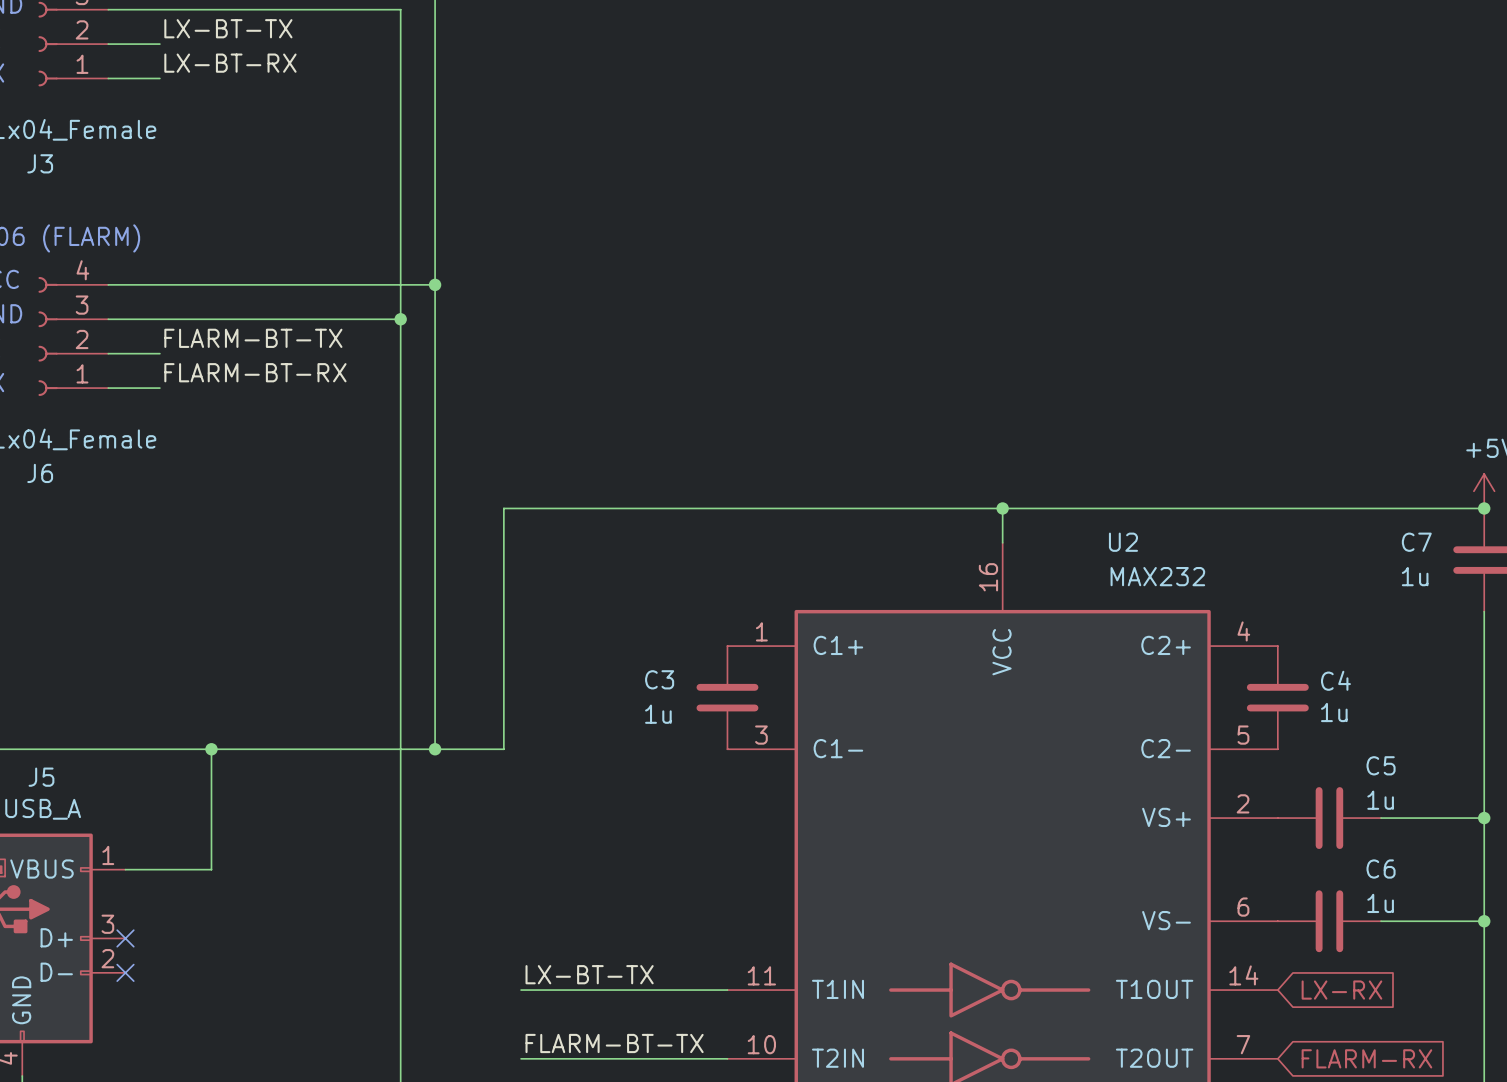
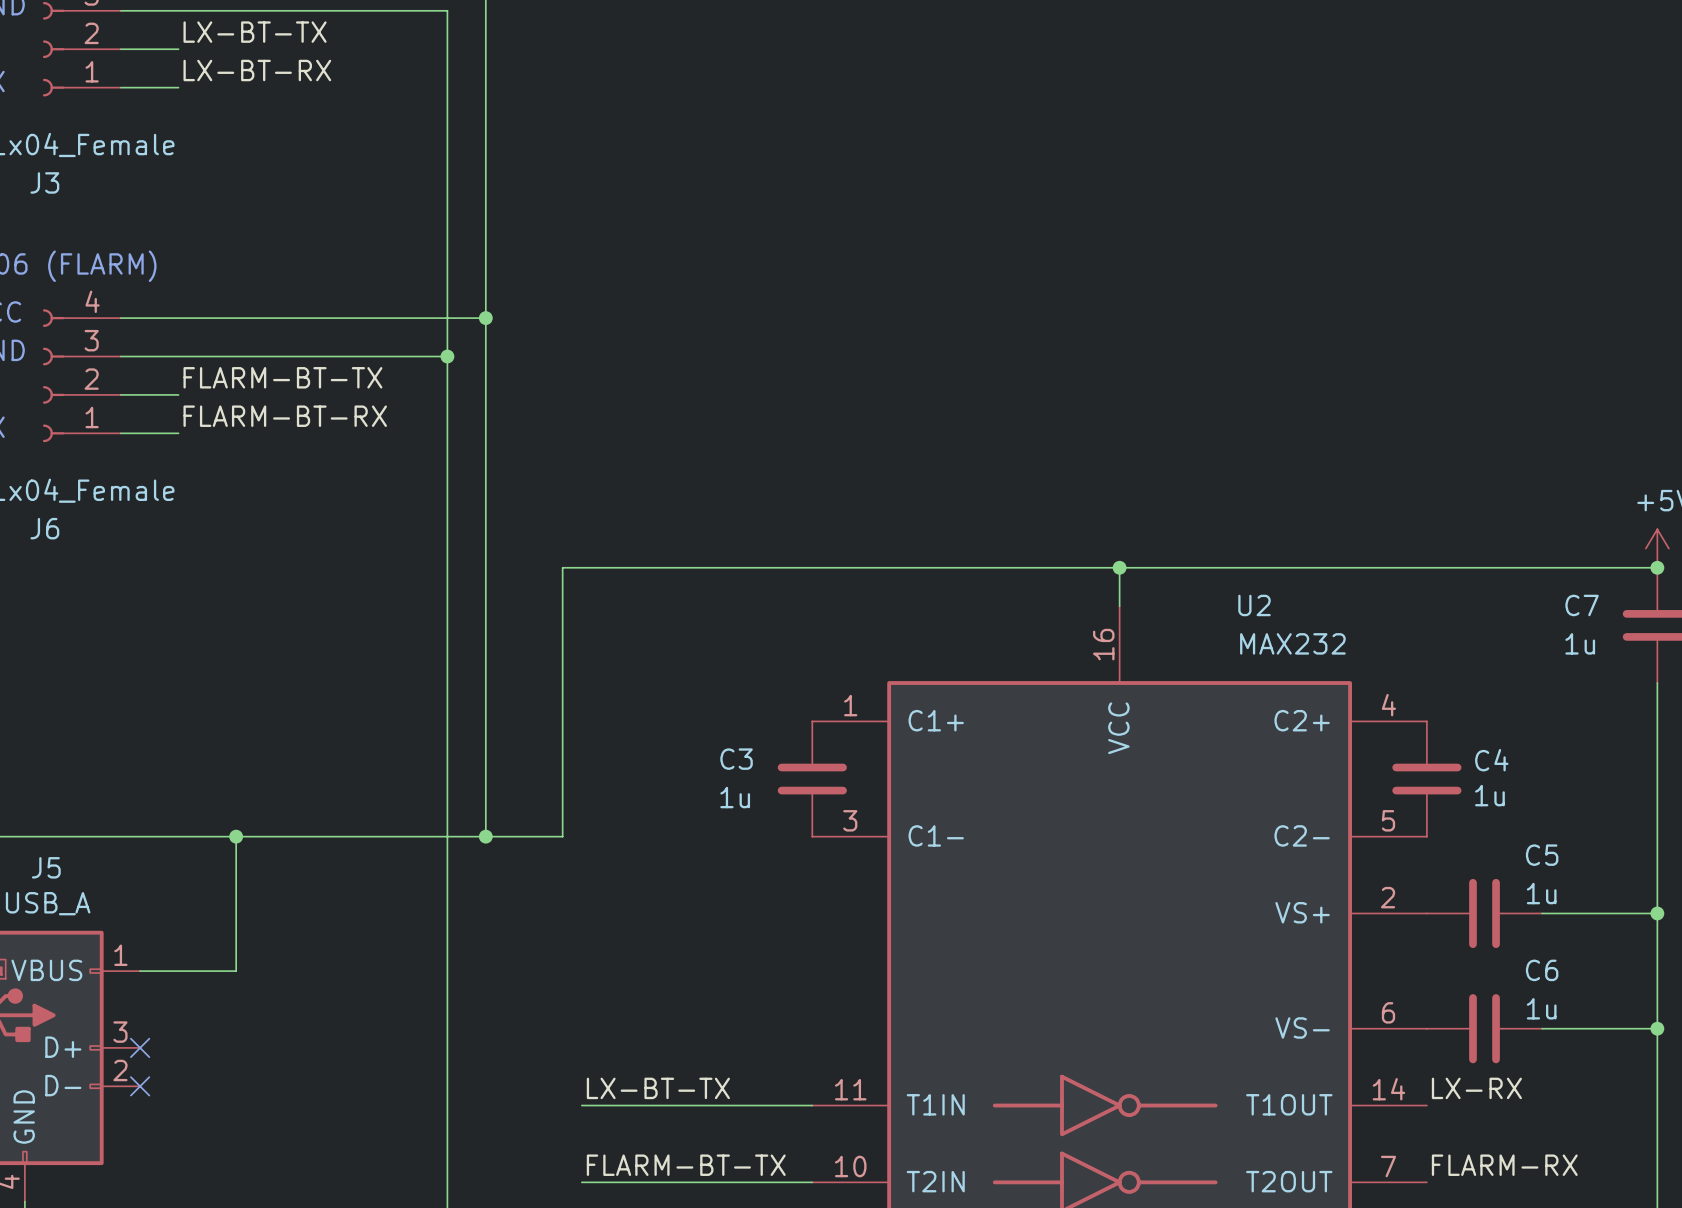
label: none -> LX-RX (1476, 1088)
global label: LX-RX (1341, 990) -> none
label: none -> FLARM-RX (1504, 1165)
global label: FLARM-RX (1366, 1058) -> none

